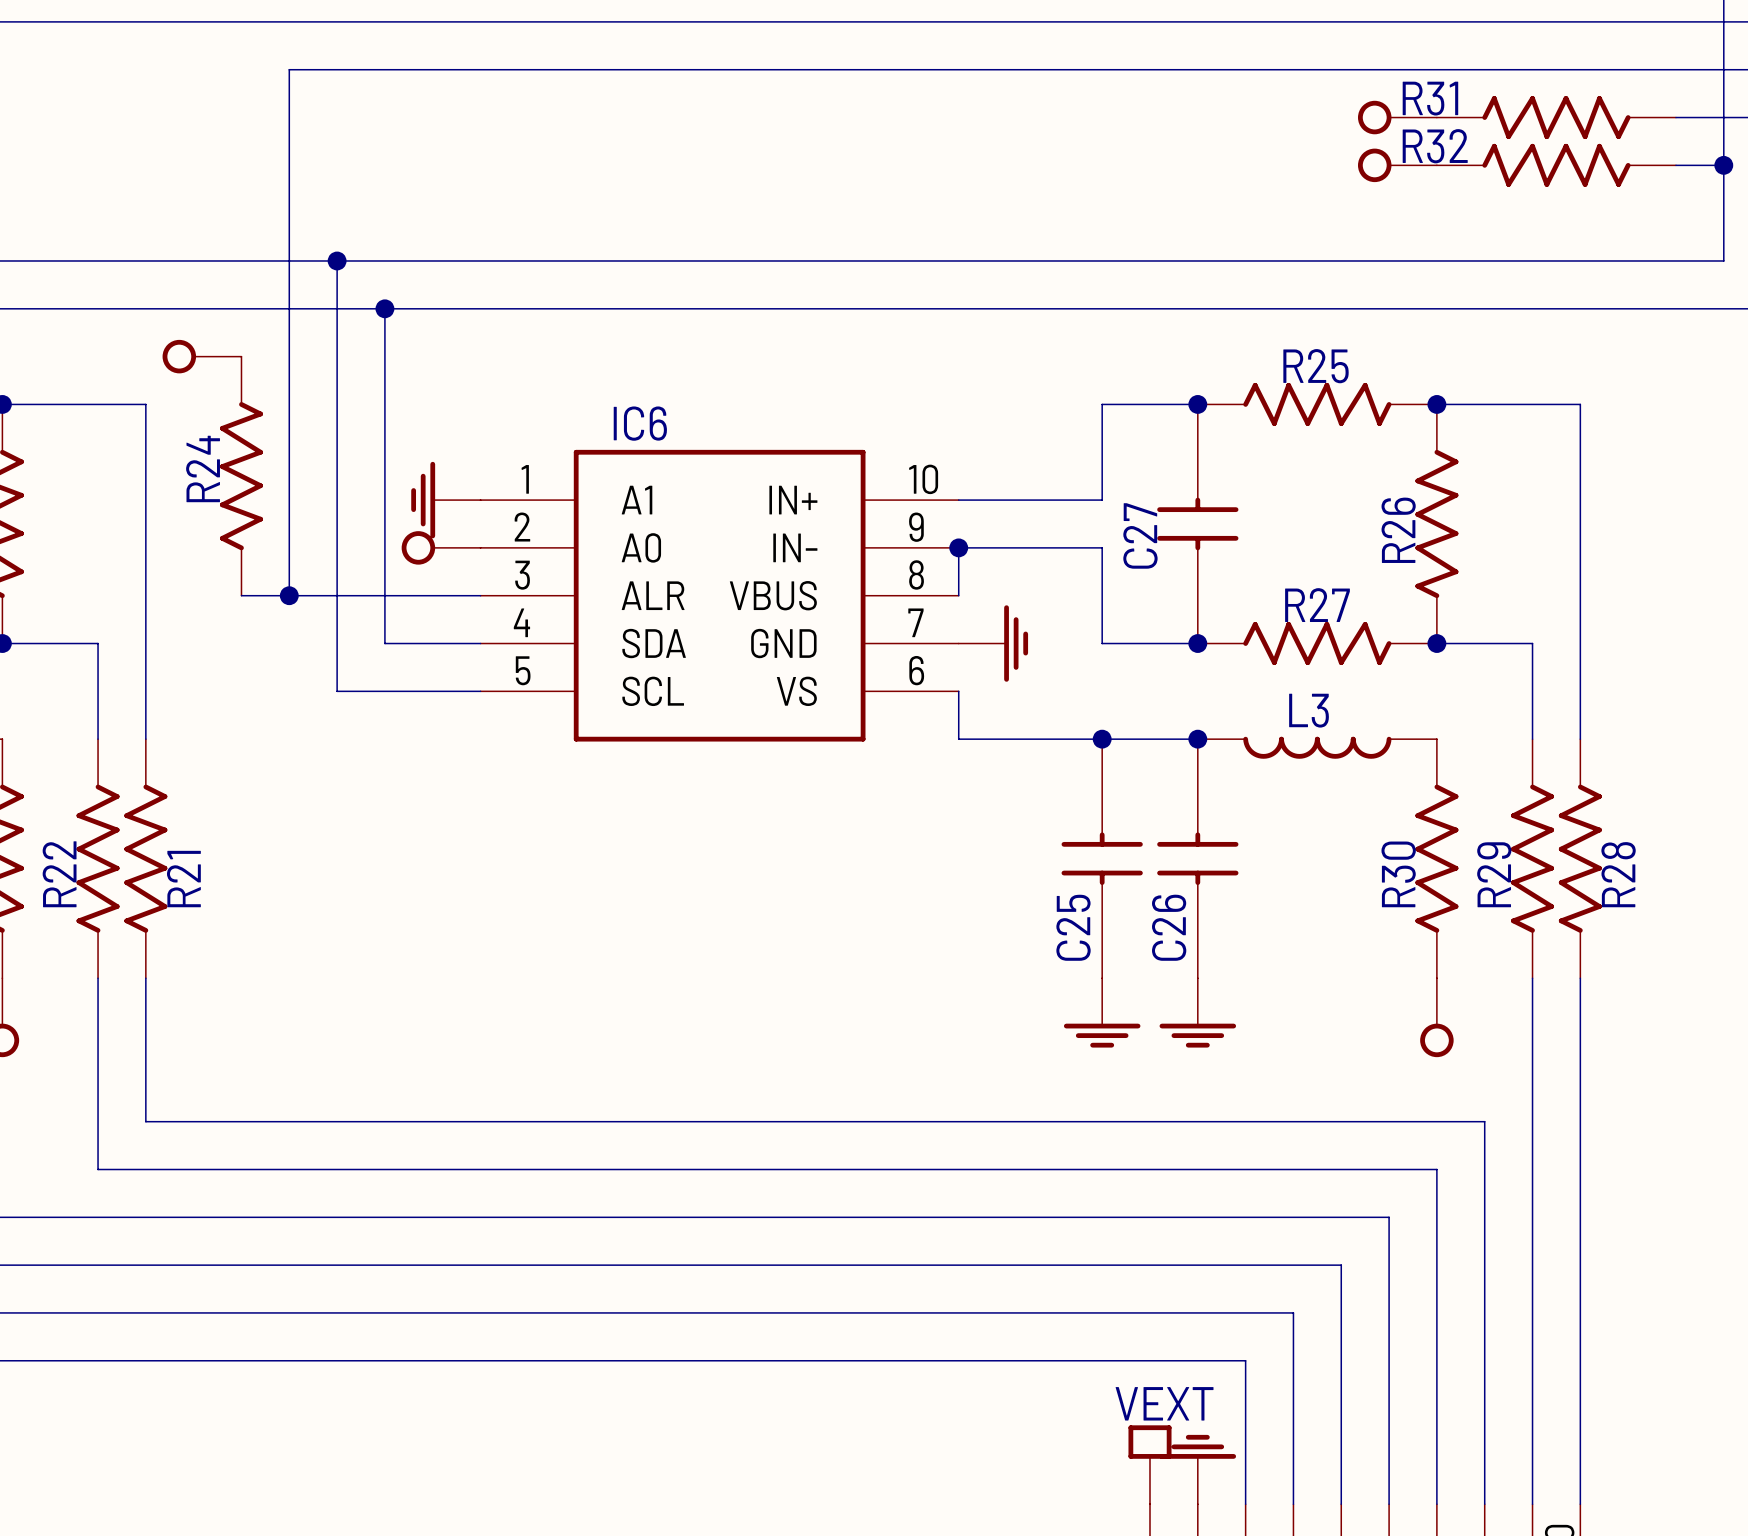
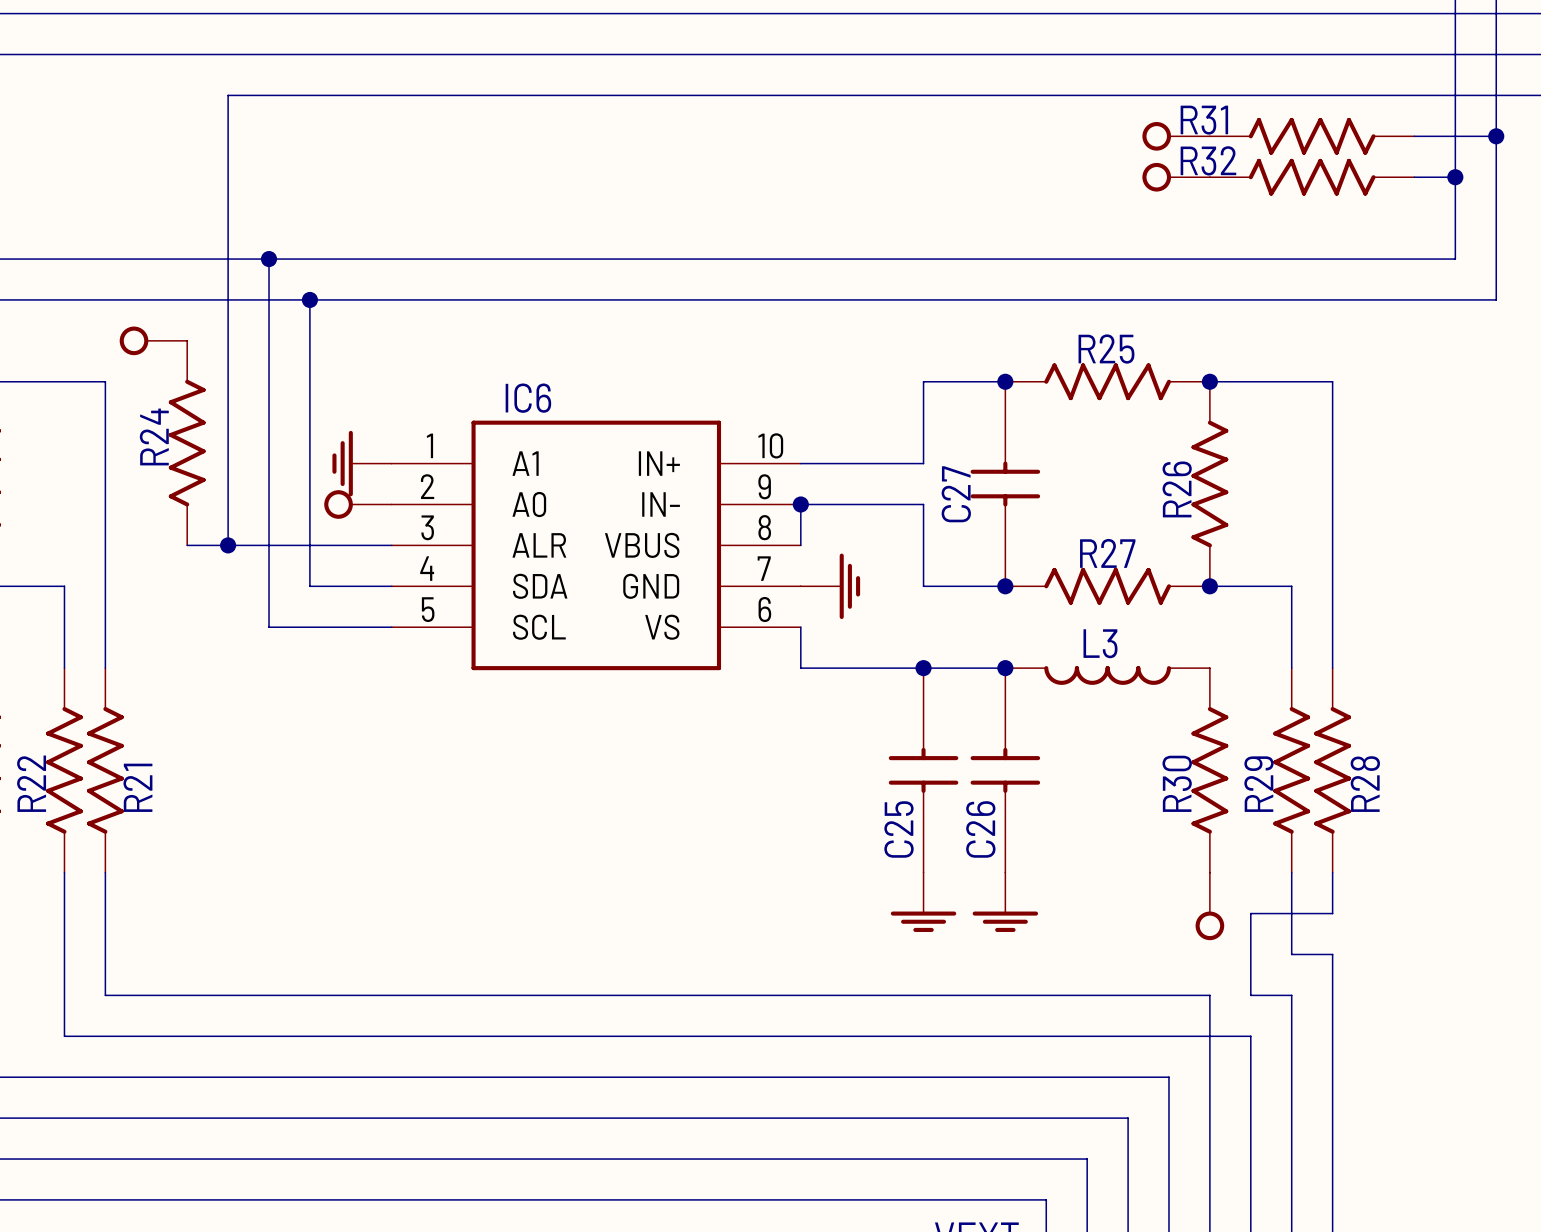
wire: (1580, 1026) (1580, 1073) -> (1332, 913) (1250, 913) (1250, 995) (1291, 995)
wire: (1532, 1073) (1532, 1121) -> (1291, 954) (1332, 954)
wire: (1436, 1121) (1484, 1121) (1484, 1169) -> (1209, 995) (1209, 1036) (1250, 1036)

